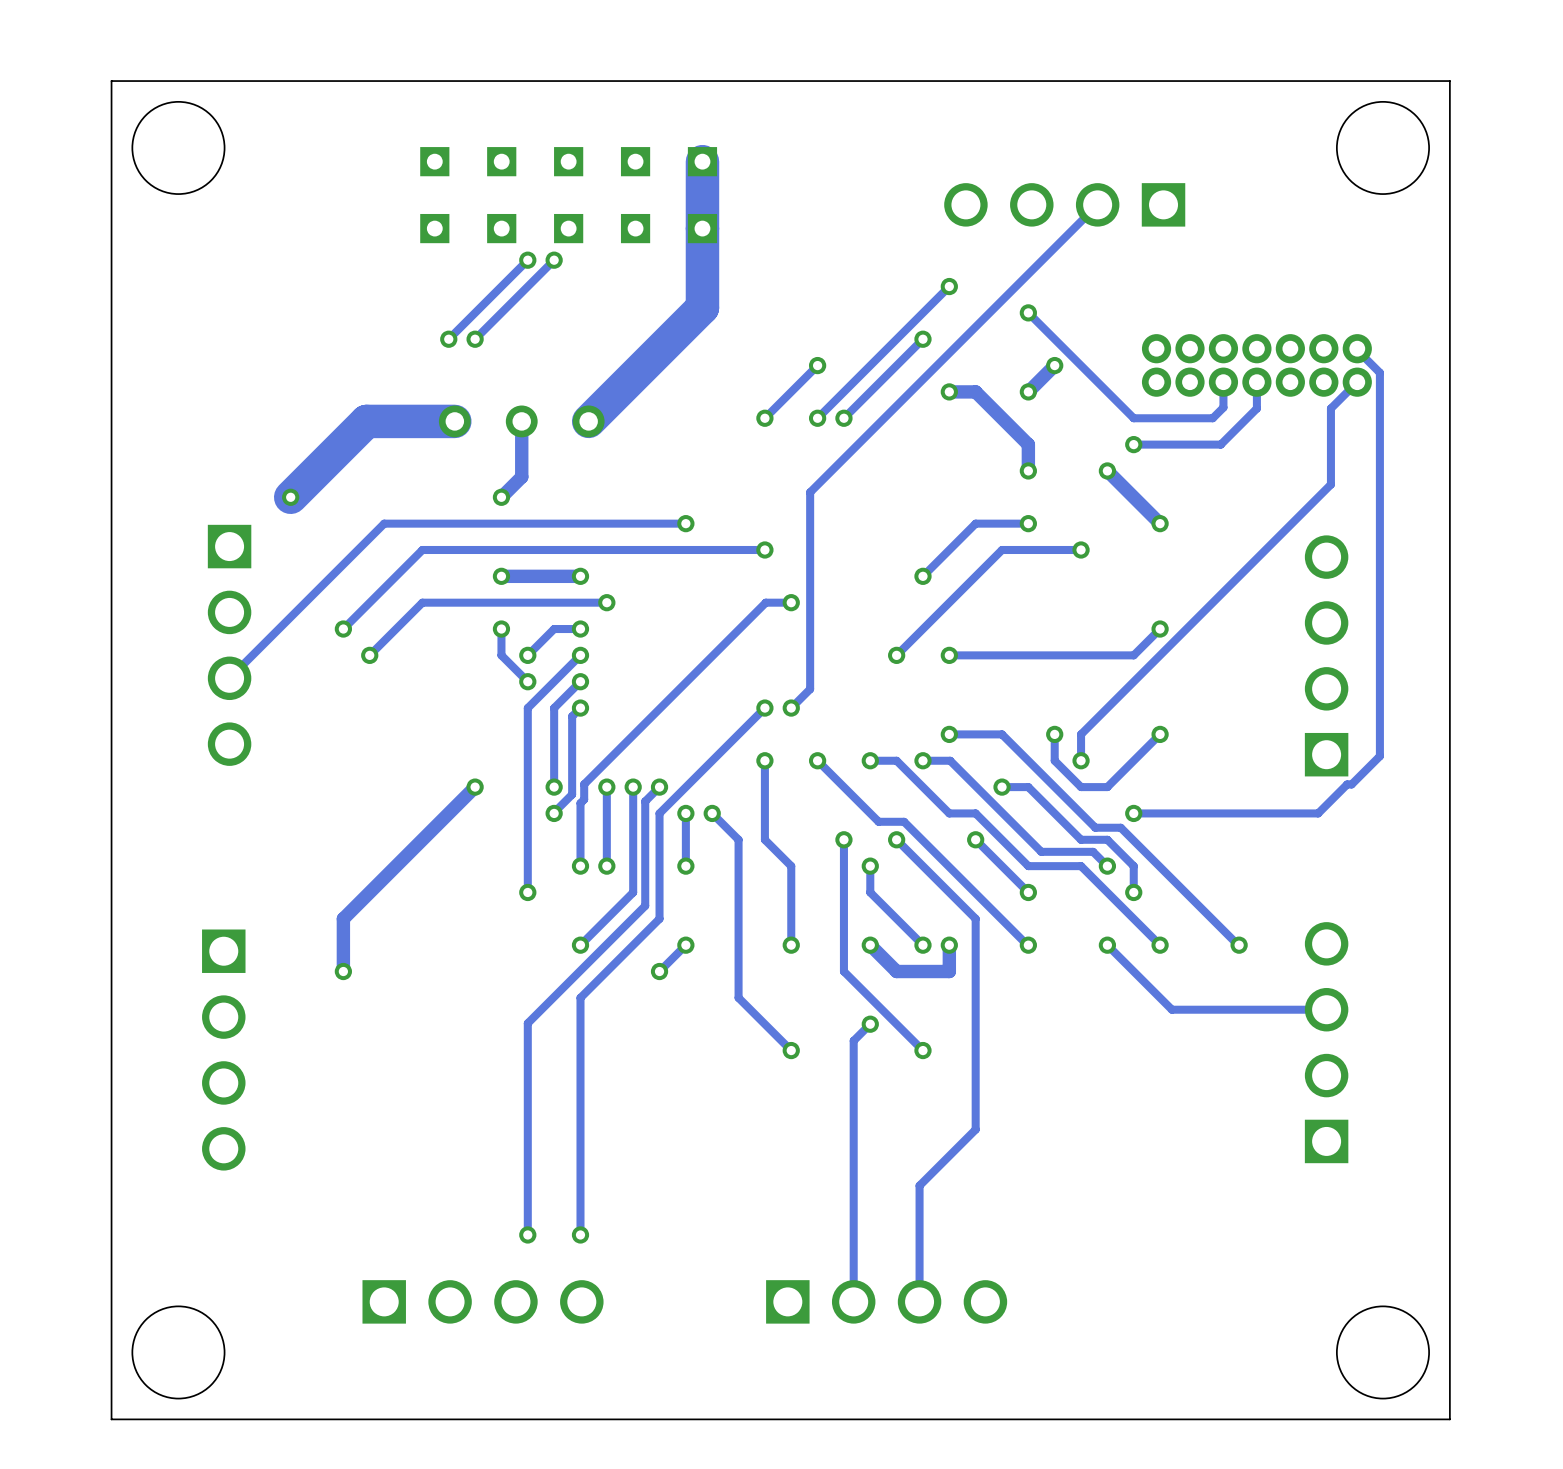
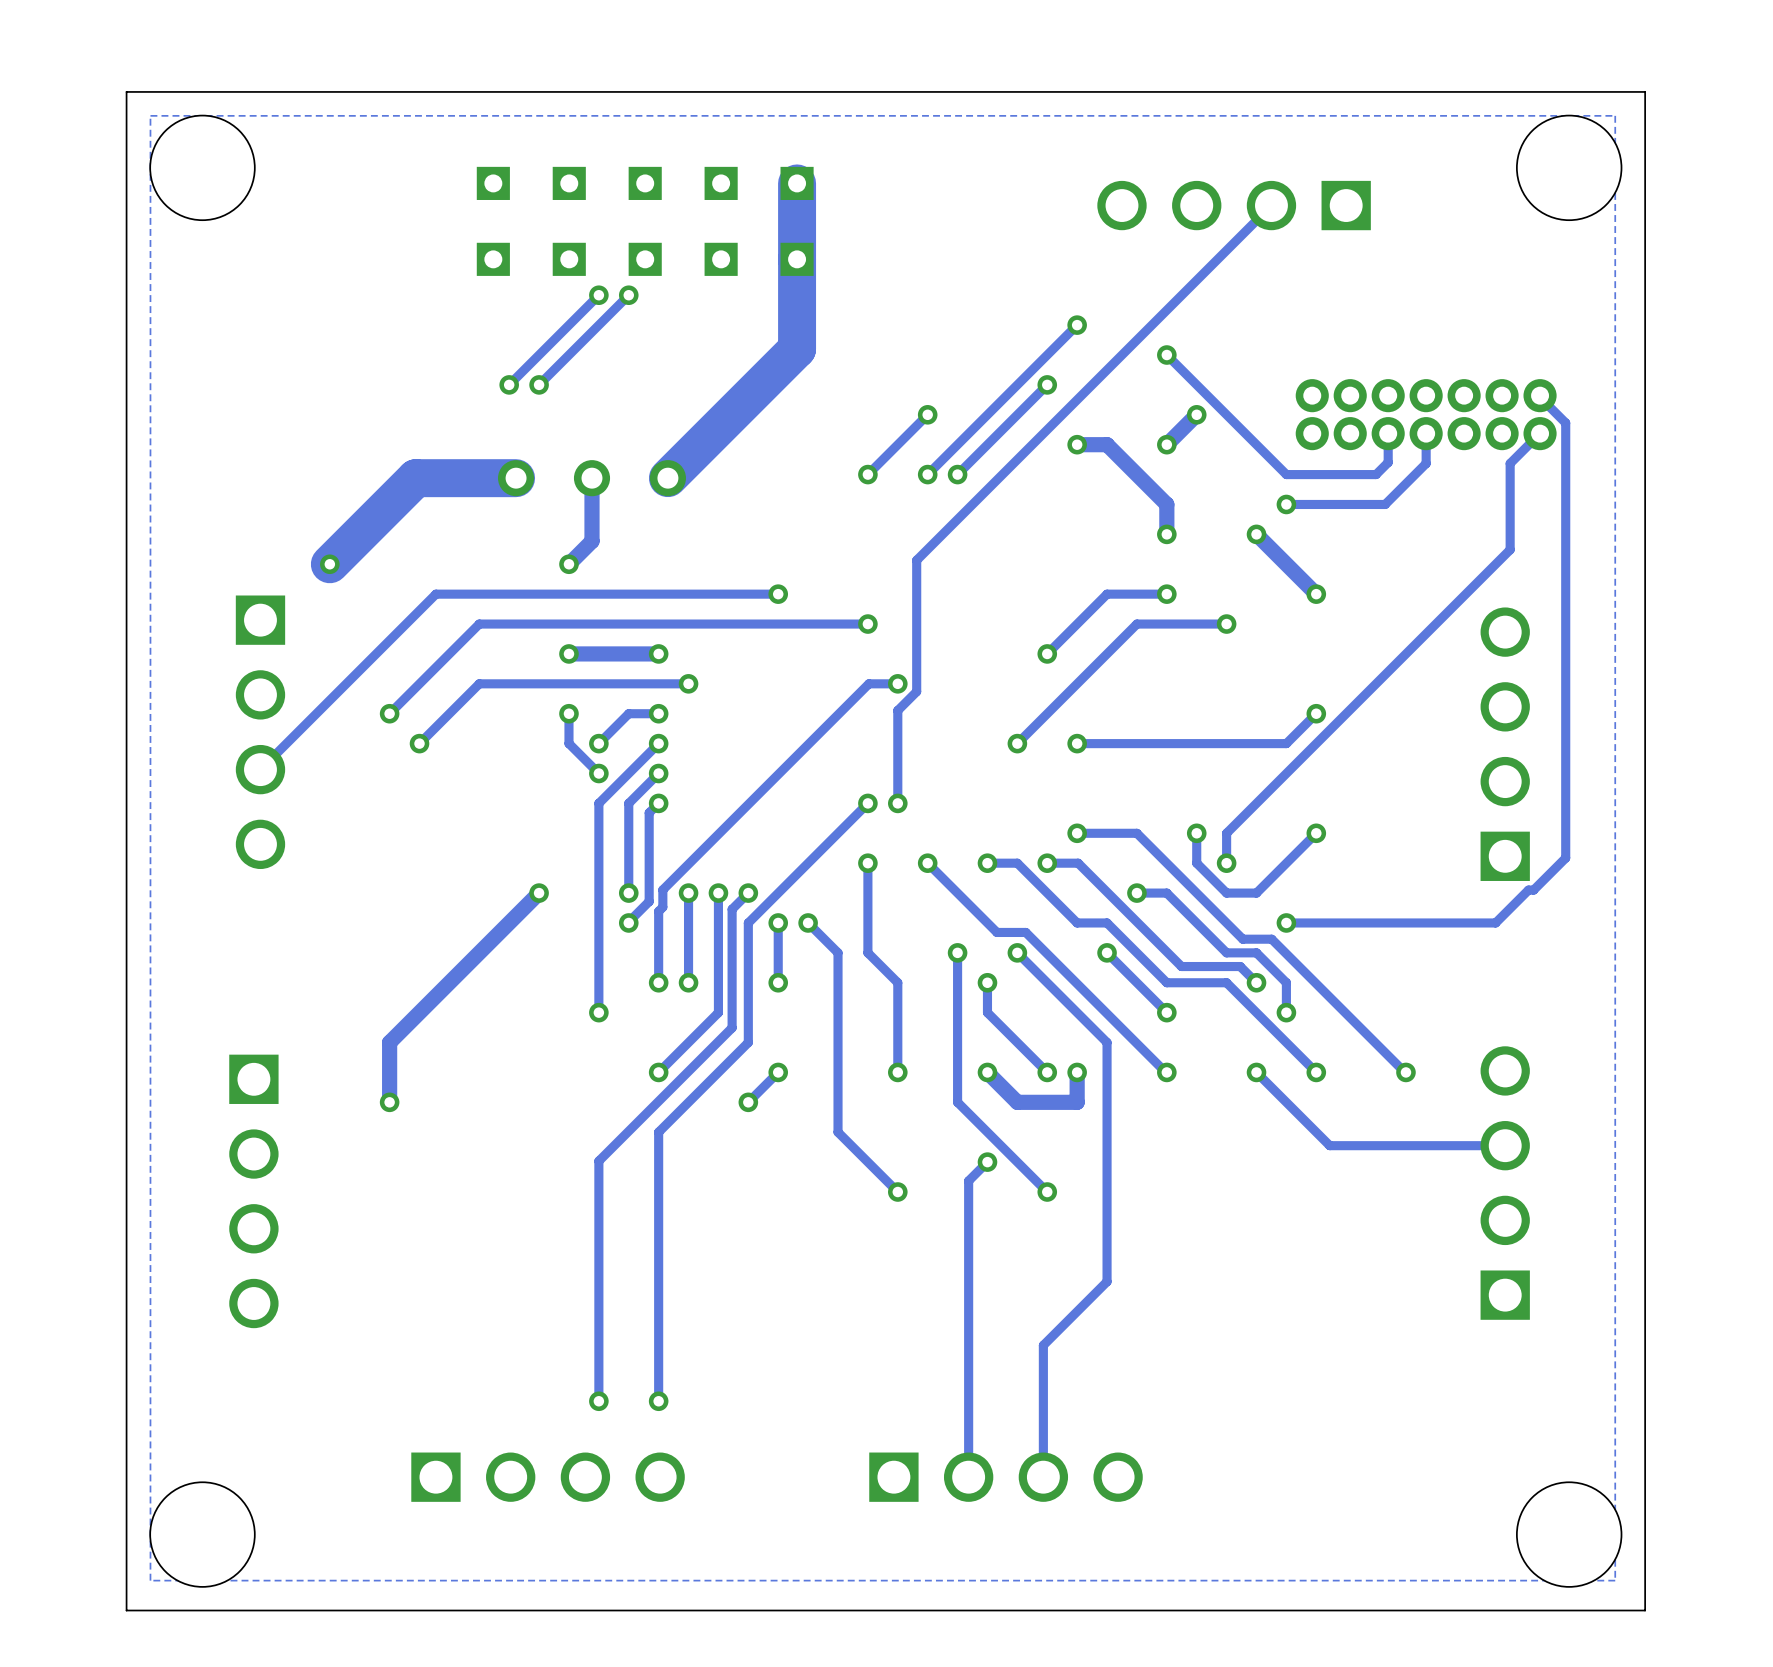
zone outline: none -> (1615, 115) (1615, 1580) (150, 1580) (150, 115) (1615, 115)
part position: (1064, 204) -> (1234, 205)
track: (1097, 204) (810, 492) (810, 689) (791, 708) -> (1271, 205) (916, 560) (916, 691) (897, 710) (897, 803)

